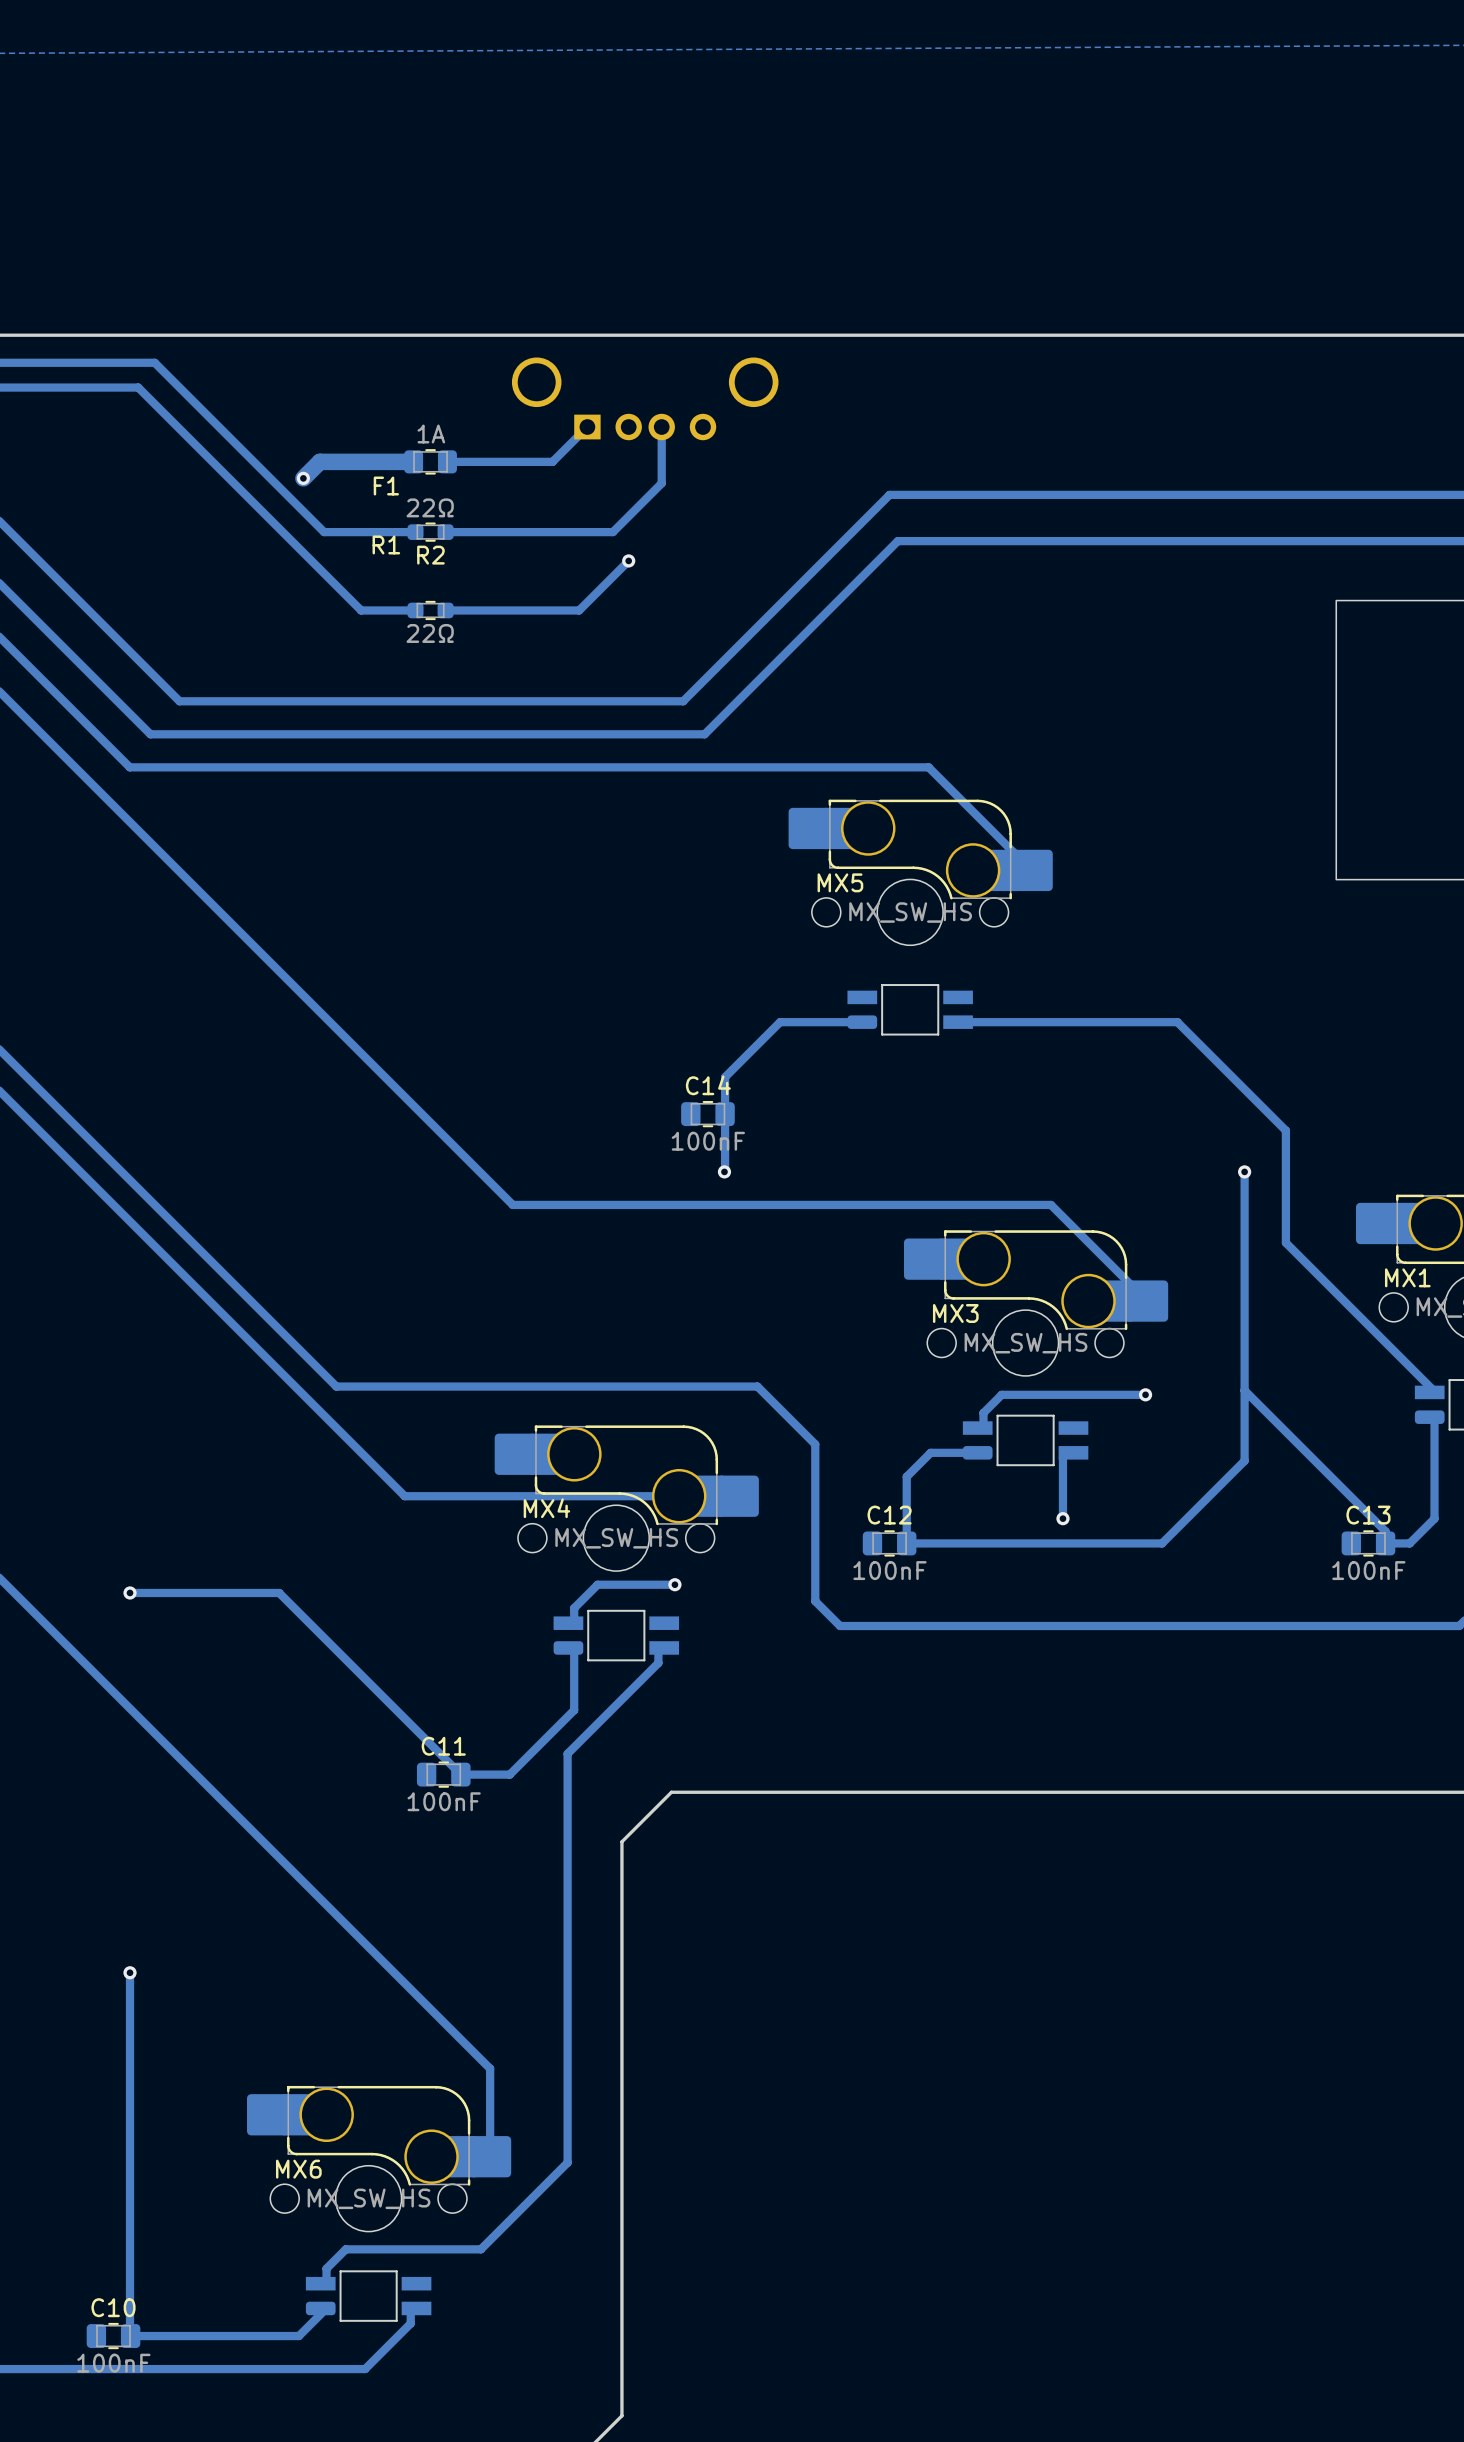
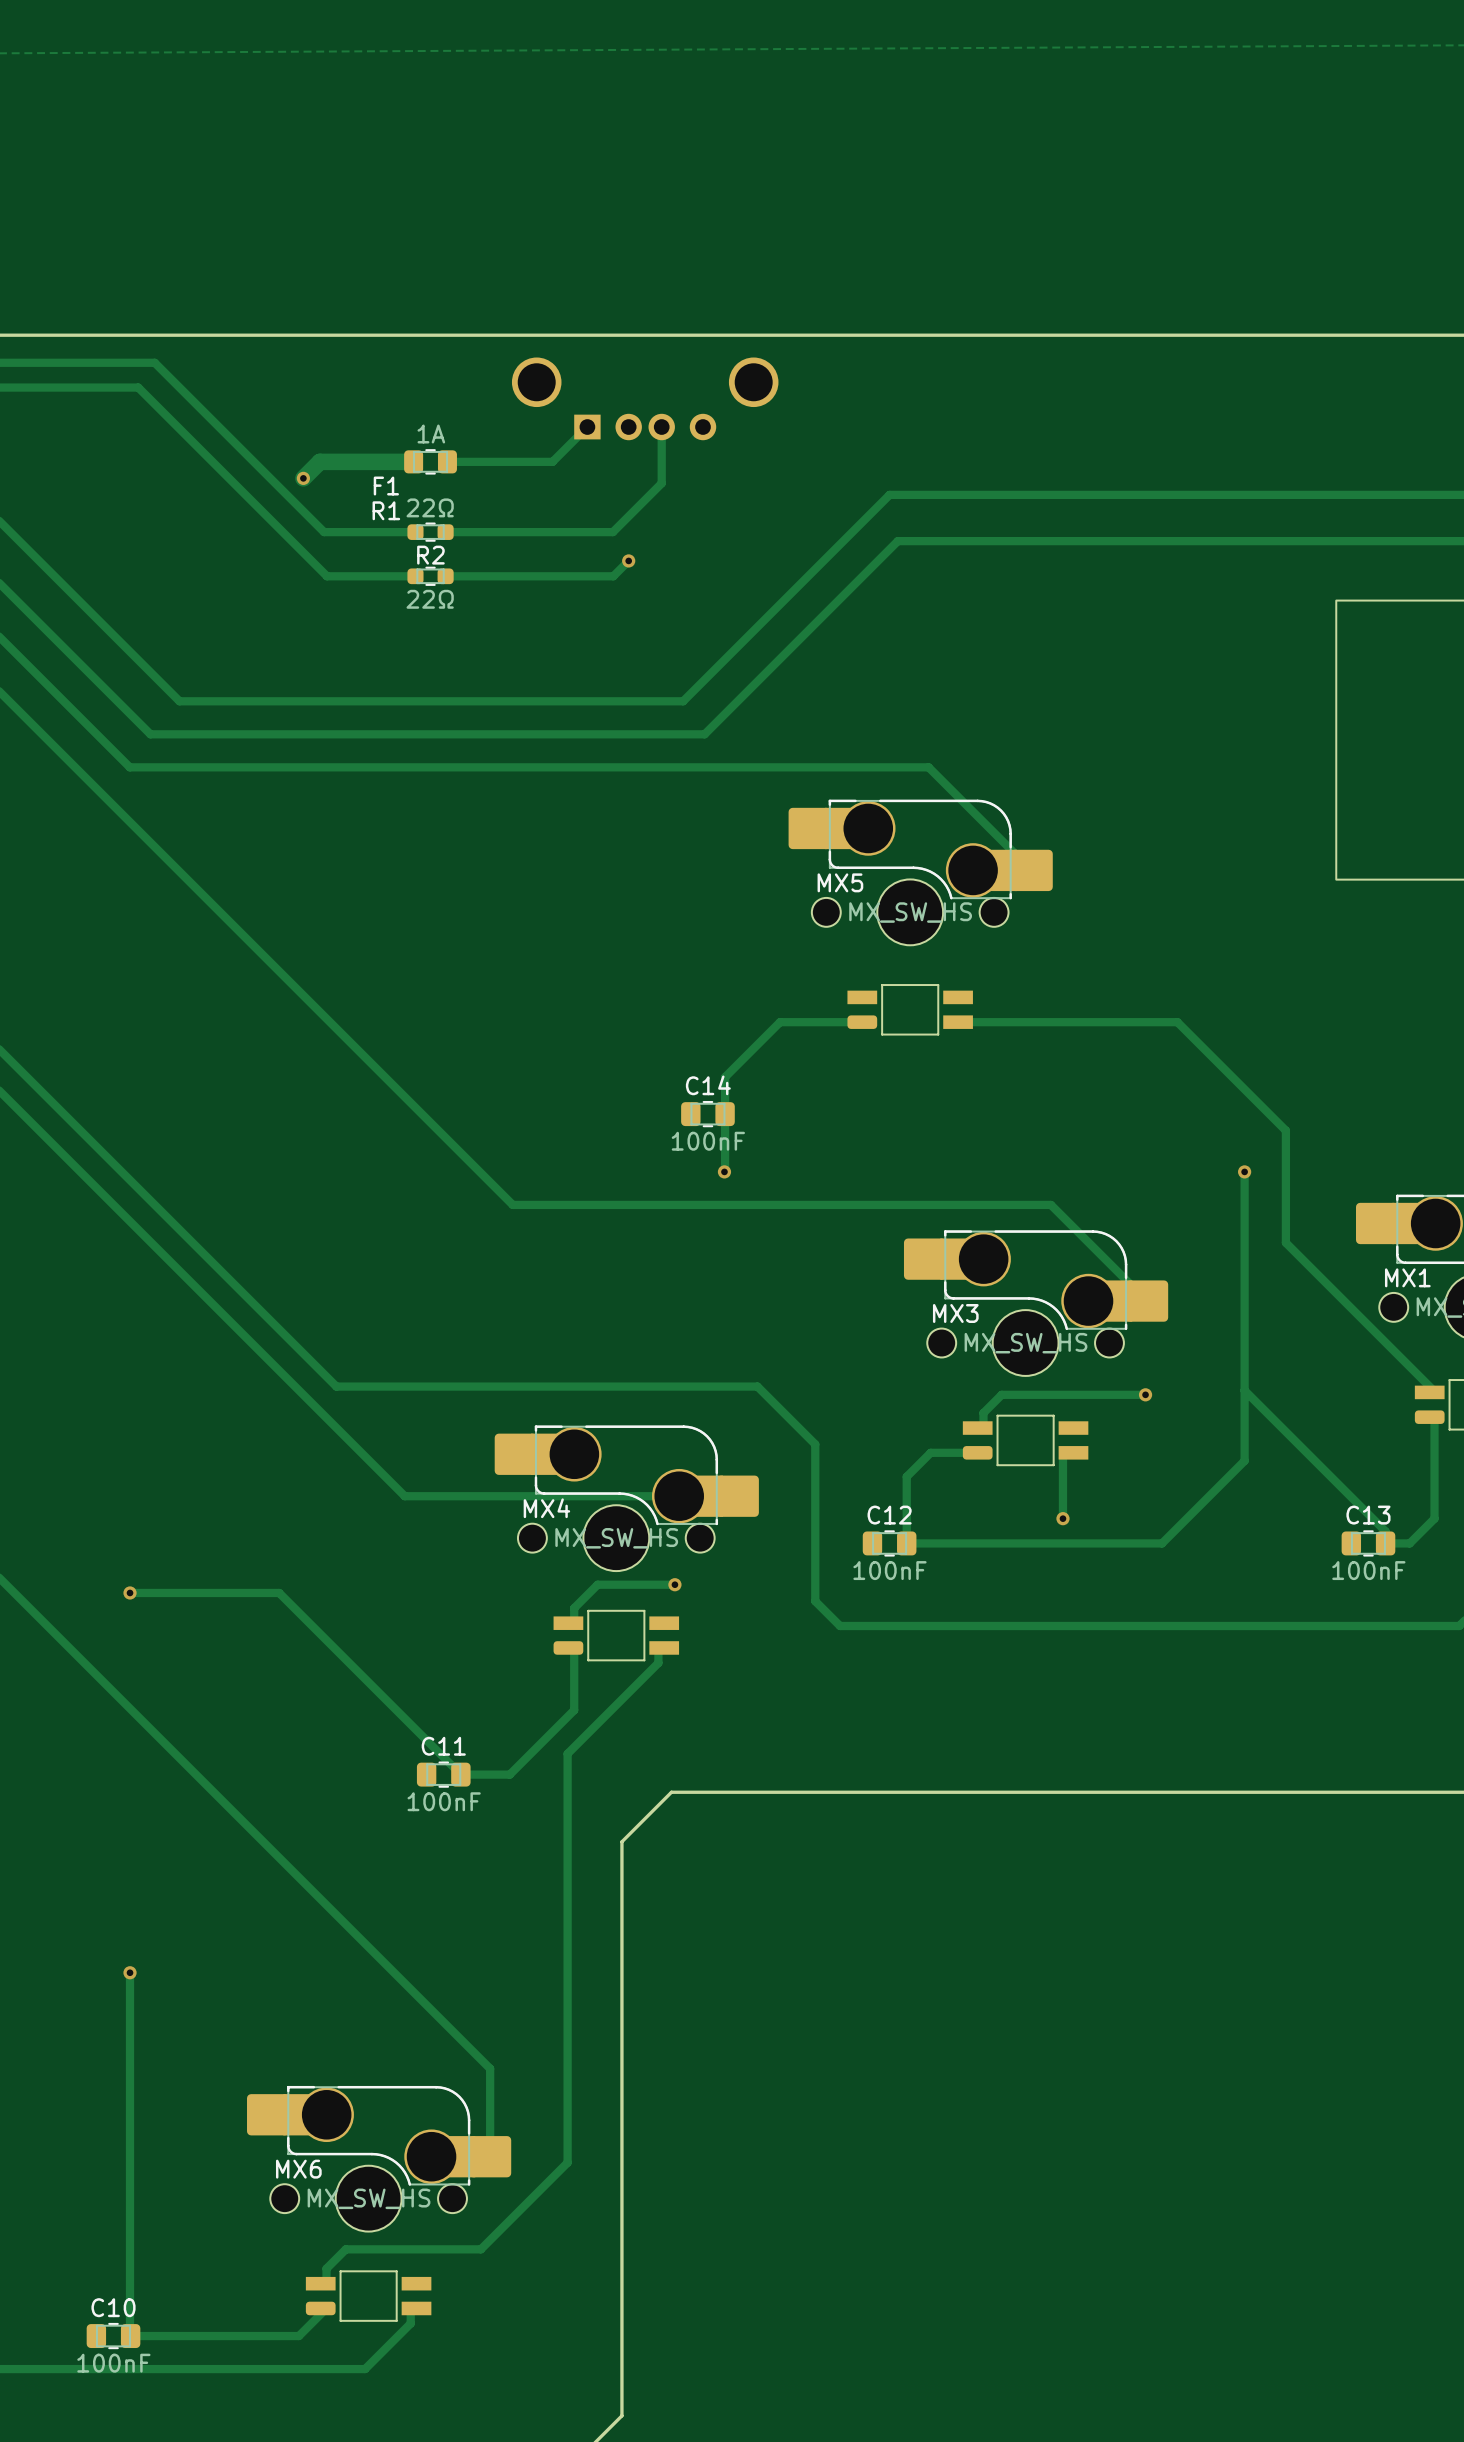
track: (327, 576) (361, 610) (415, 610) -> (327, 576) (415, 576)
track: (613, 576) (579, 610) (445, 610) -> (613, 576) (445, 576)
R1 position: (430, 610) -> (430, 576)

